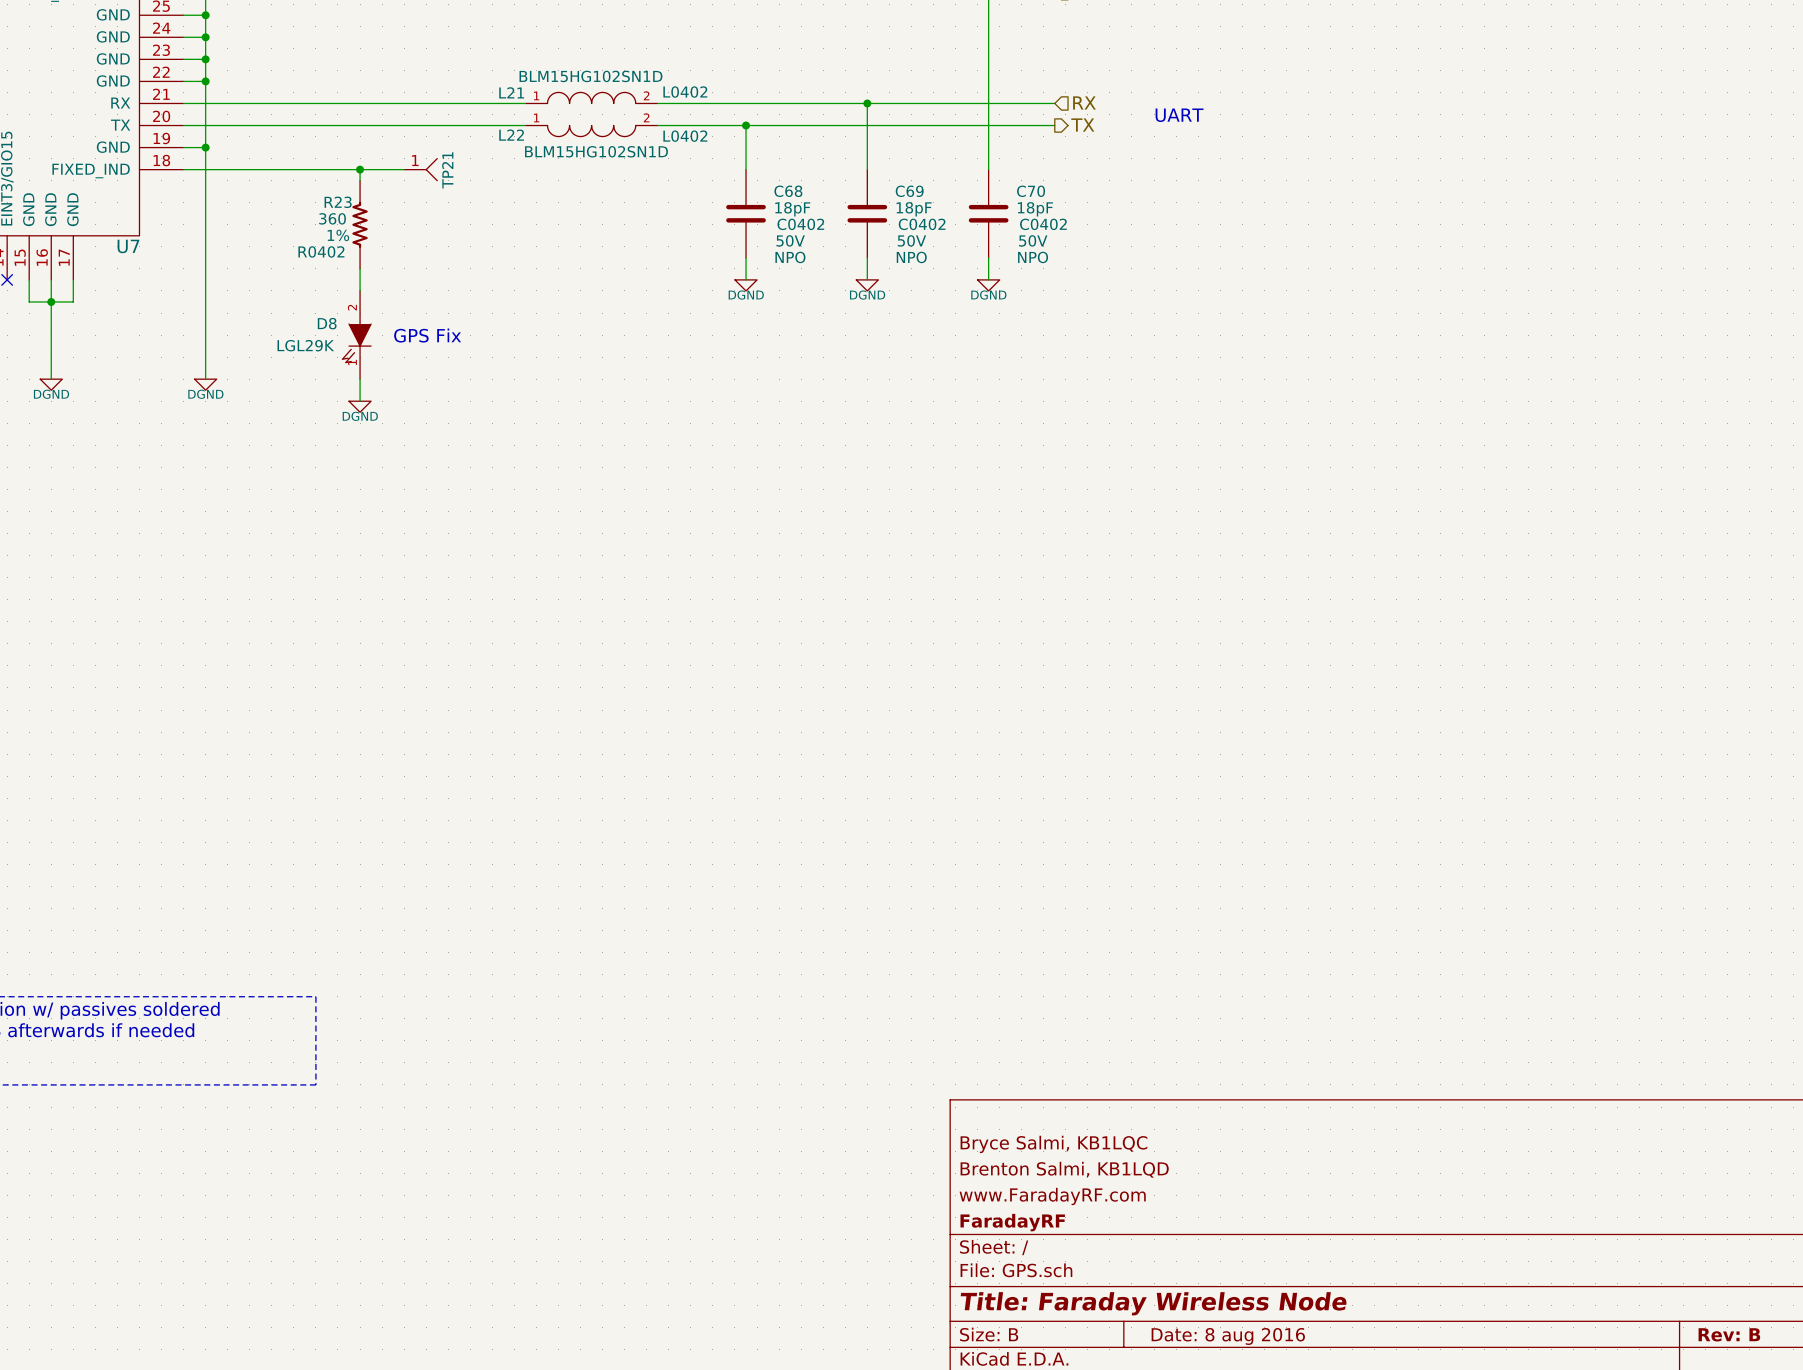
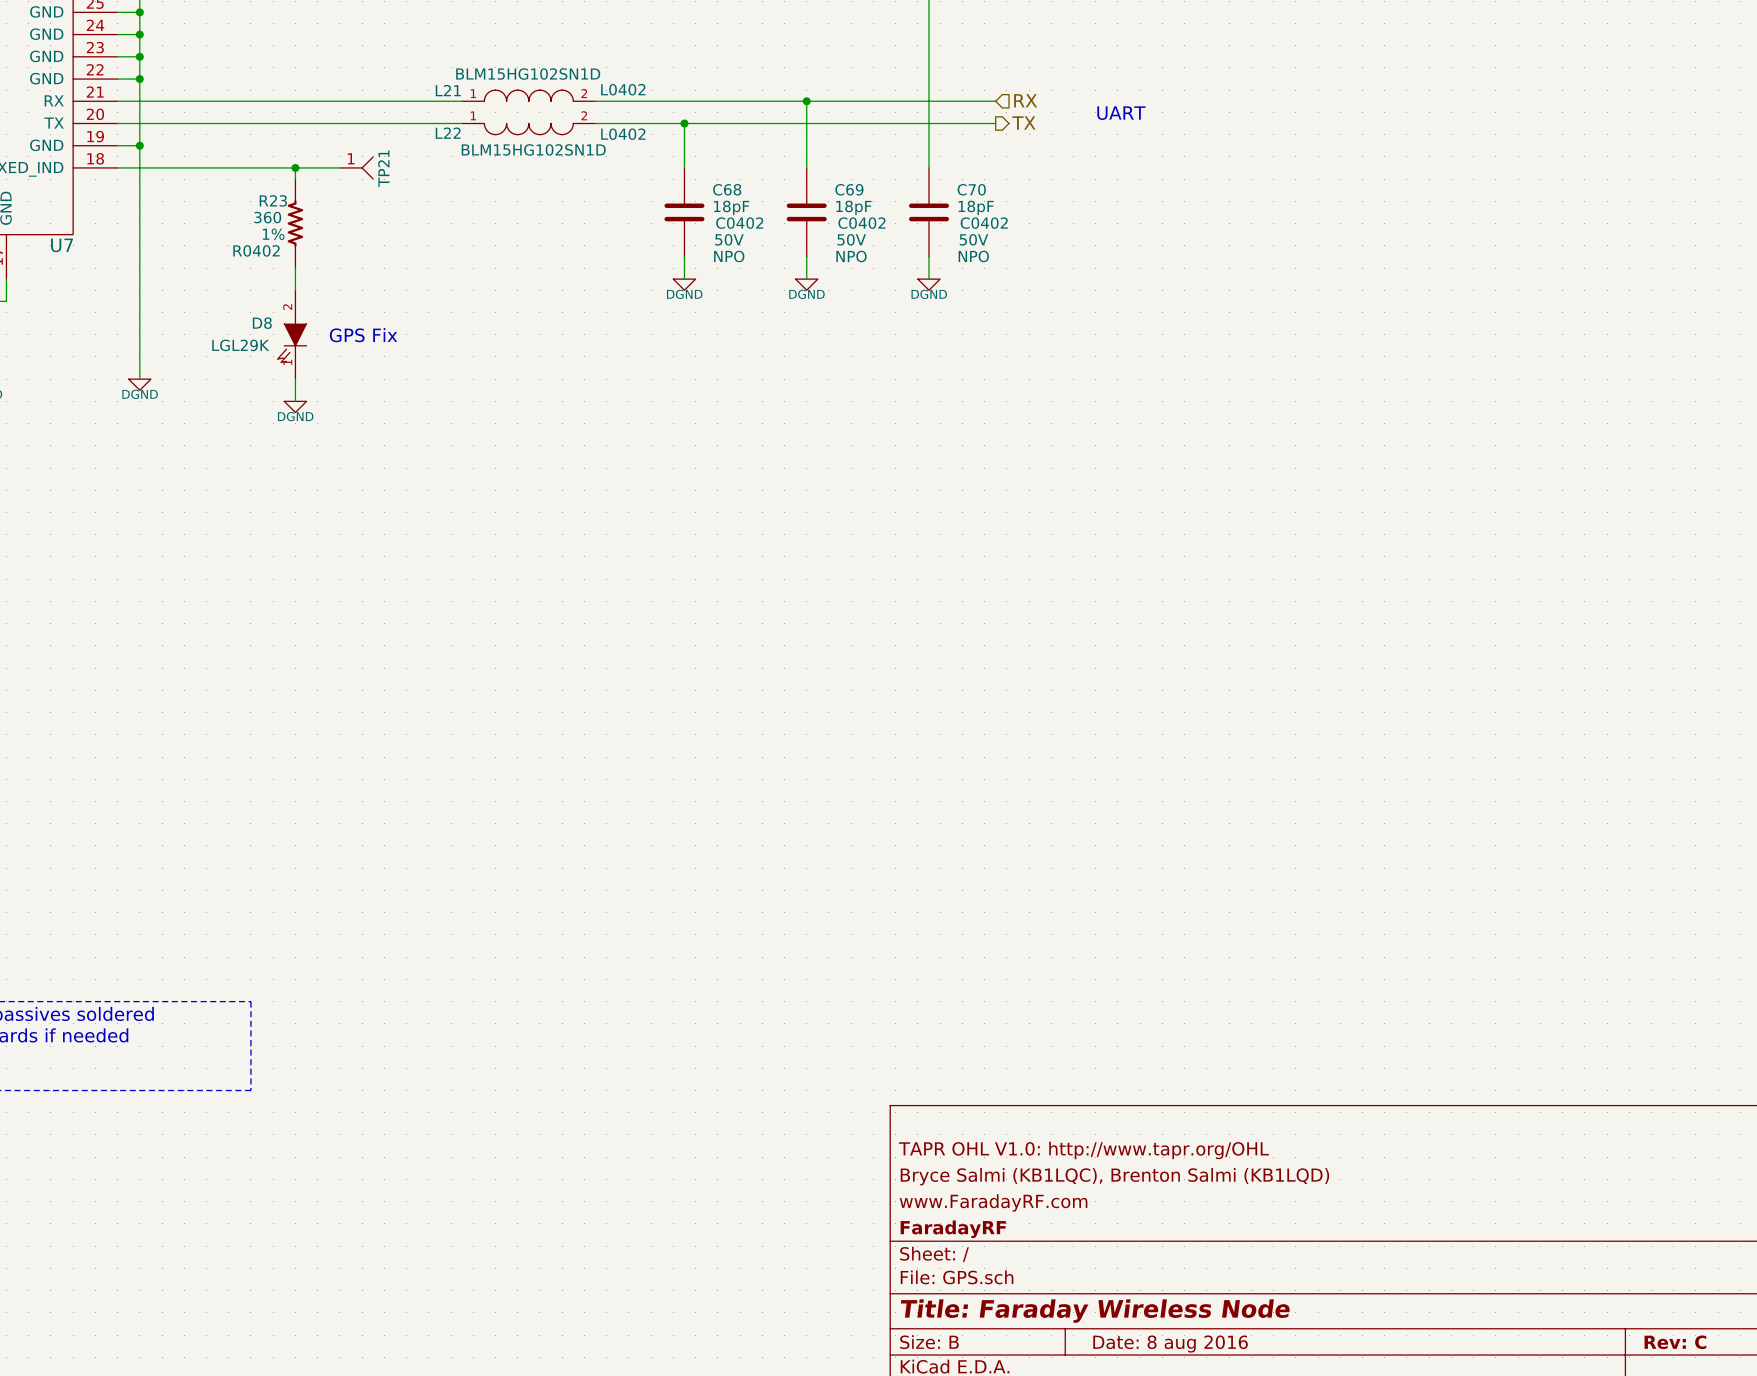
title block: Bryce Salmi, KB1LQC (1053, 1144) -> TAPR OHL V1.0: http://www.tapr.org/OHL (1083, 1150)
title block: Brenton Salmi, KB1LQD (1064, 1169) -> Bryce Salmi (KB1LQC), Brenton Salmi (KB1LQD) (1114, 1176)
title block: Rev: B (1729, 1334) -> Rev: C (1675, 1342)

